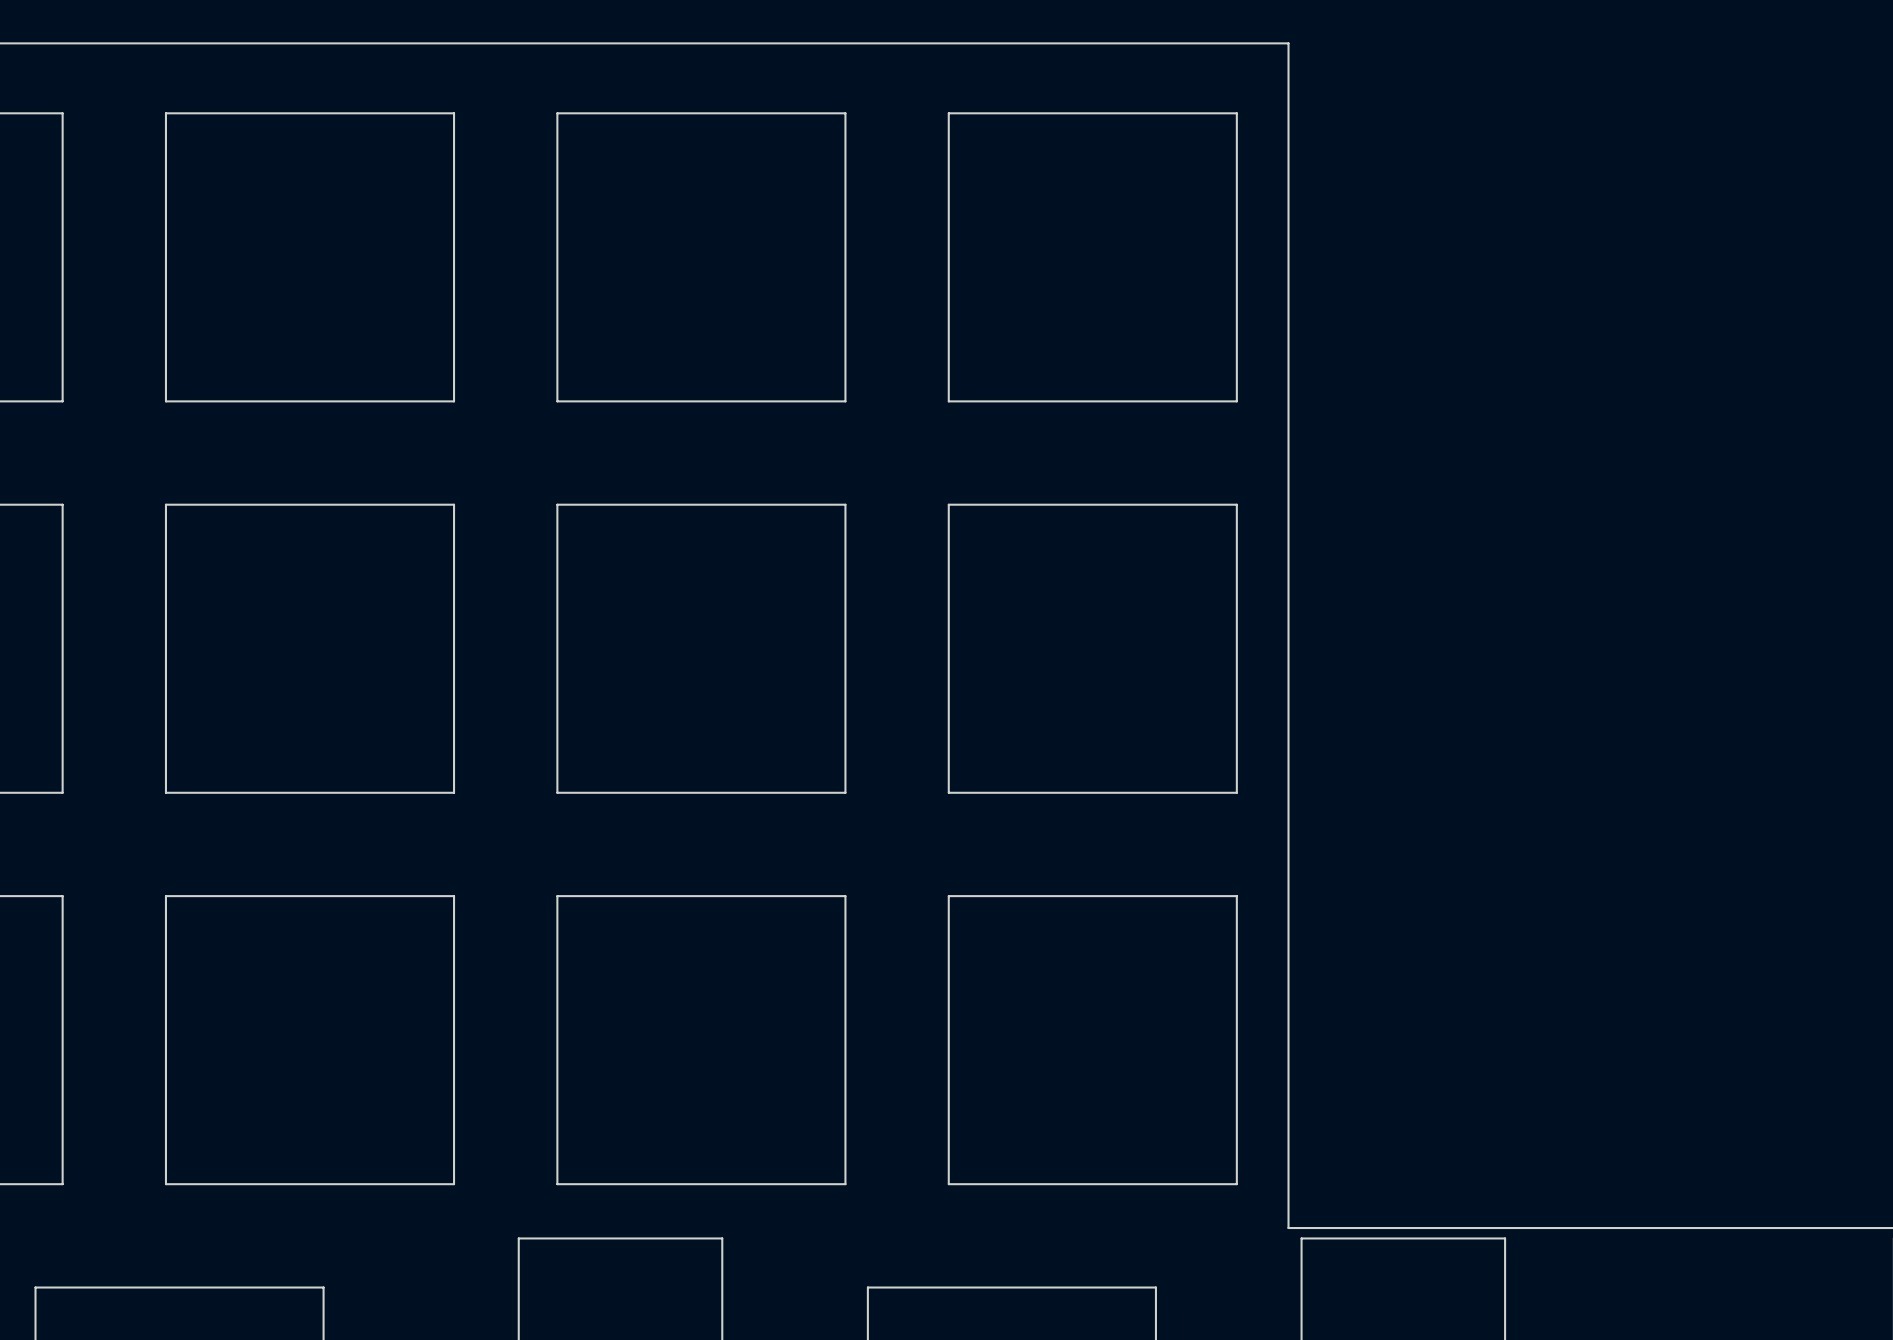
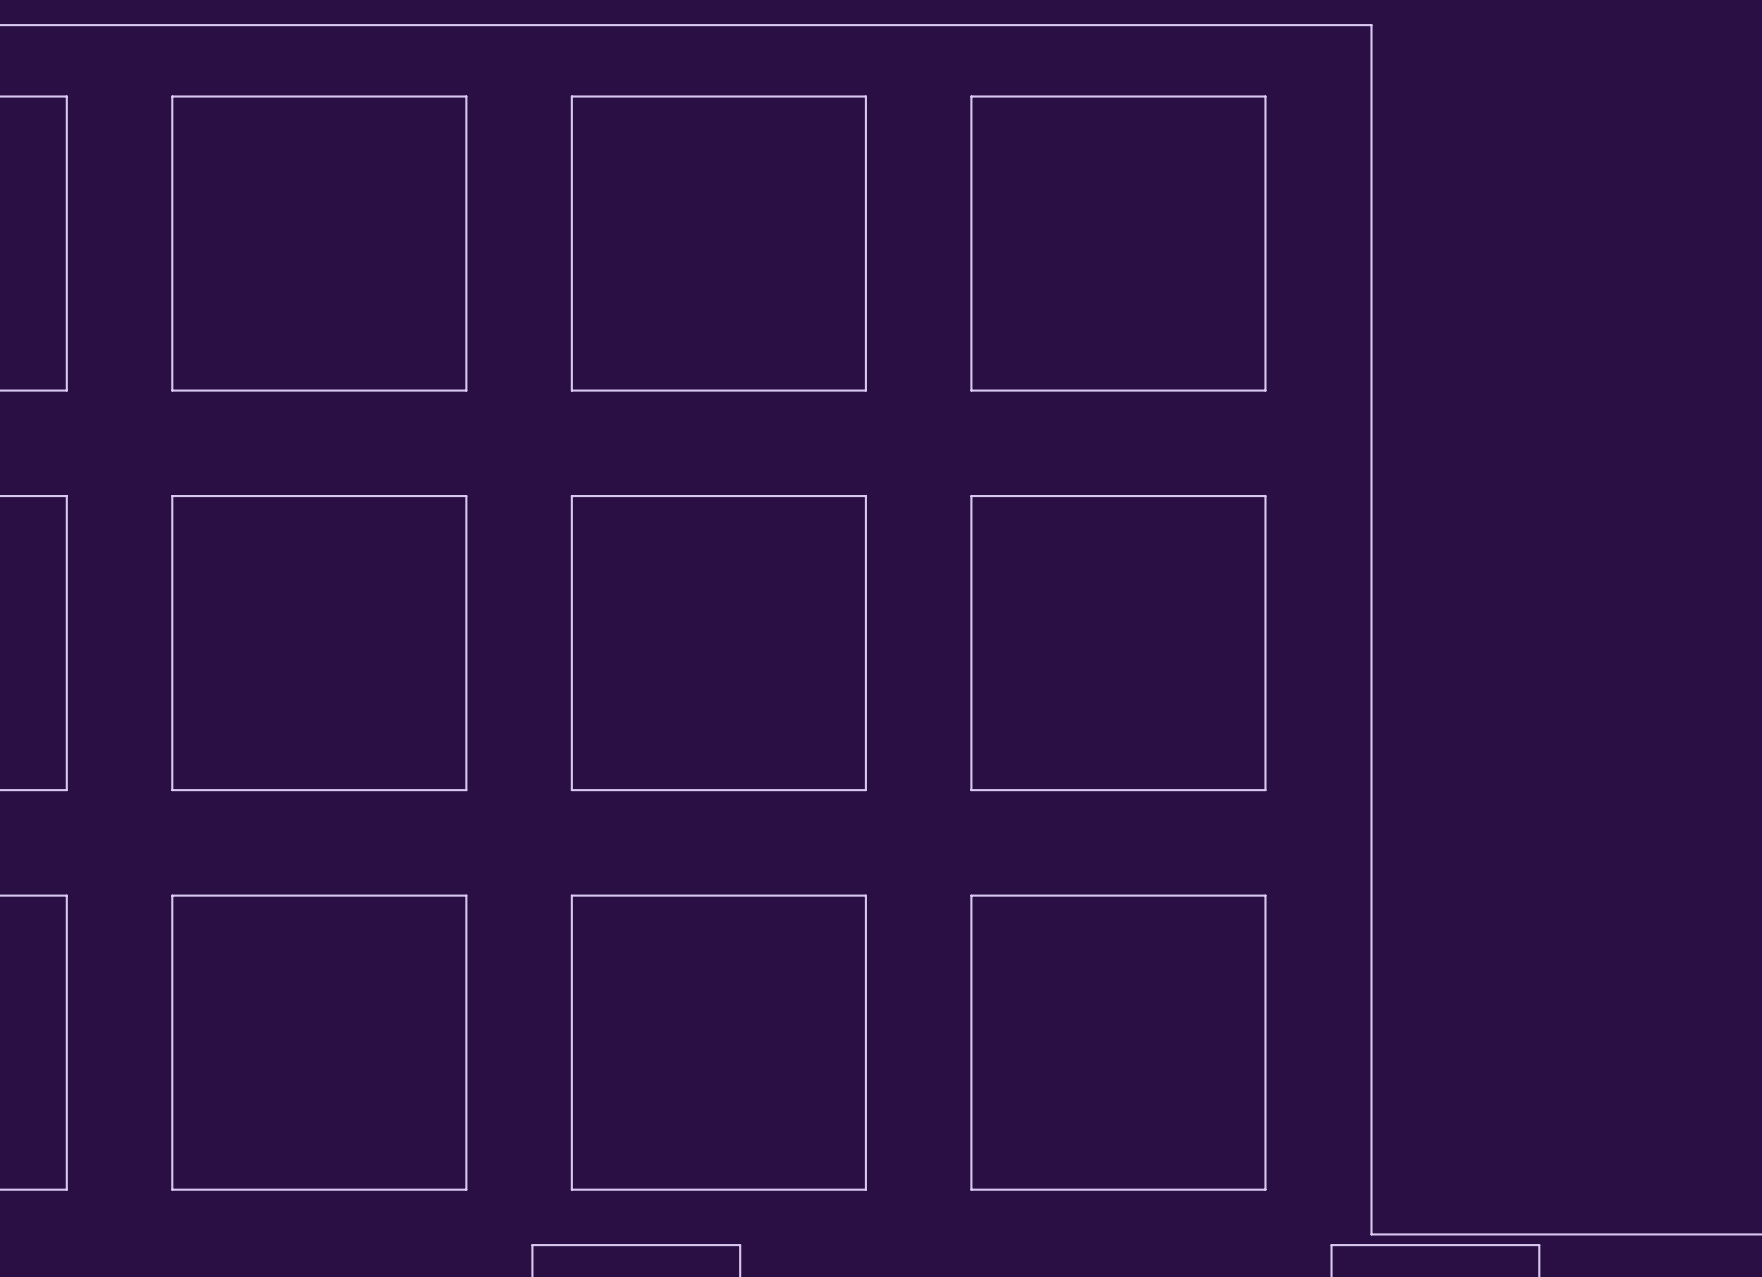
board edge: (1288, 43) (1288, 1228) (1340, 1228) -> (1318, 25) (1371, 25) (1371, 1234)

